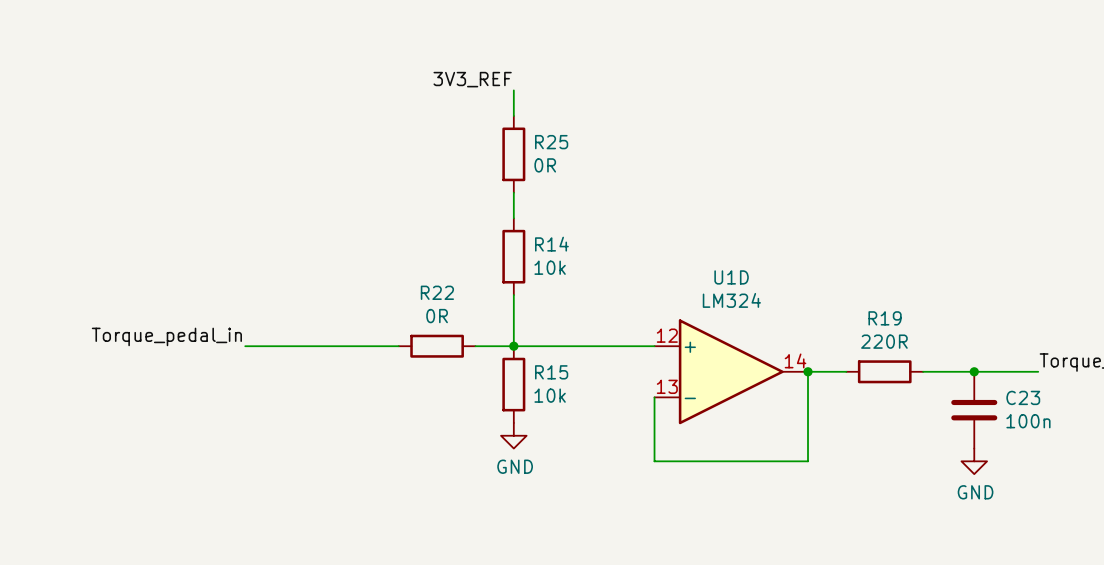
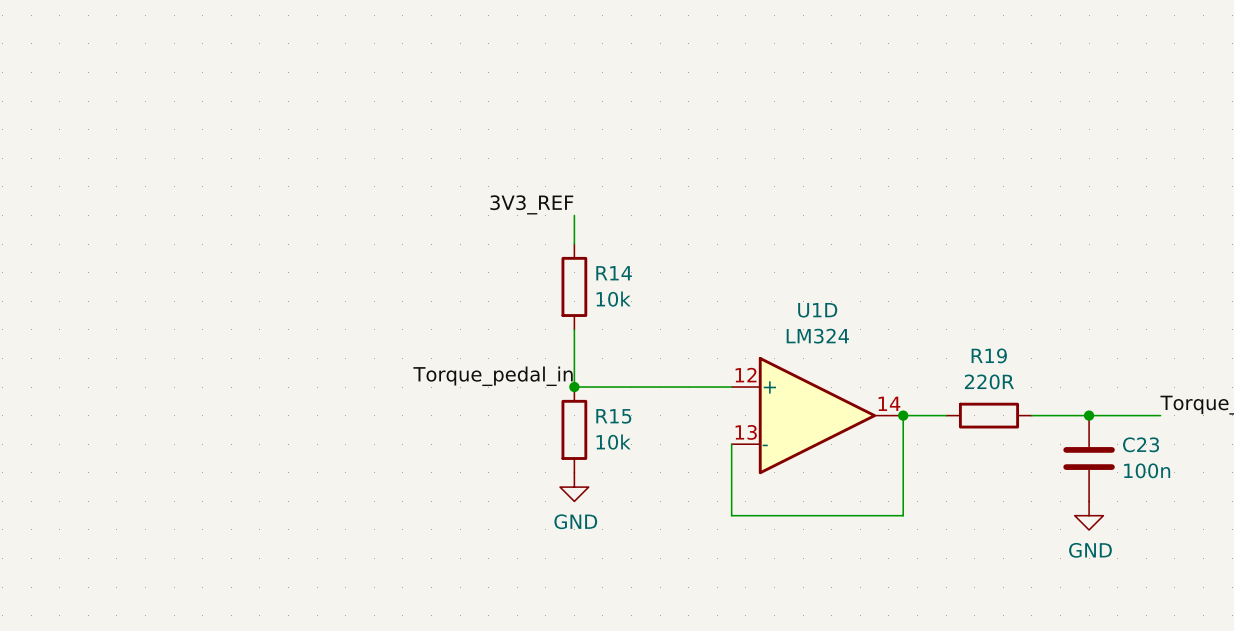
label position: 3V3_REF (472, 79) -> 3V3_REF (531, 204)
wire: (513, 90) (513, 116) -> none
R25: 0R (513, 154) -> none
label: Torque_pedal_in (166, 336) -> none
label: none -> Torque_pedal_in (493, 376)
wire: (245, 346) (398, 346) -> none
R22: 0R (437, 346) -> none
wire: (475, 346) (513, 346) -> none

